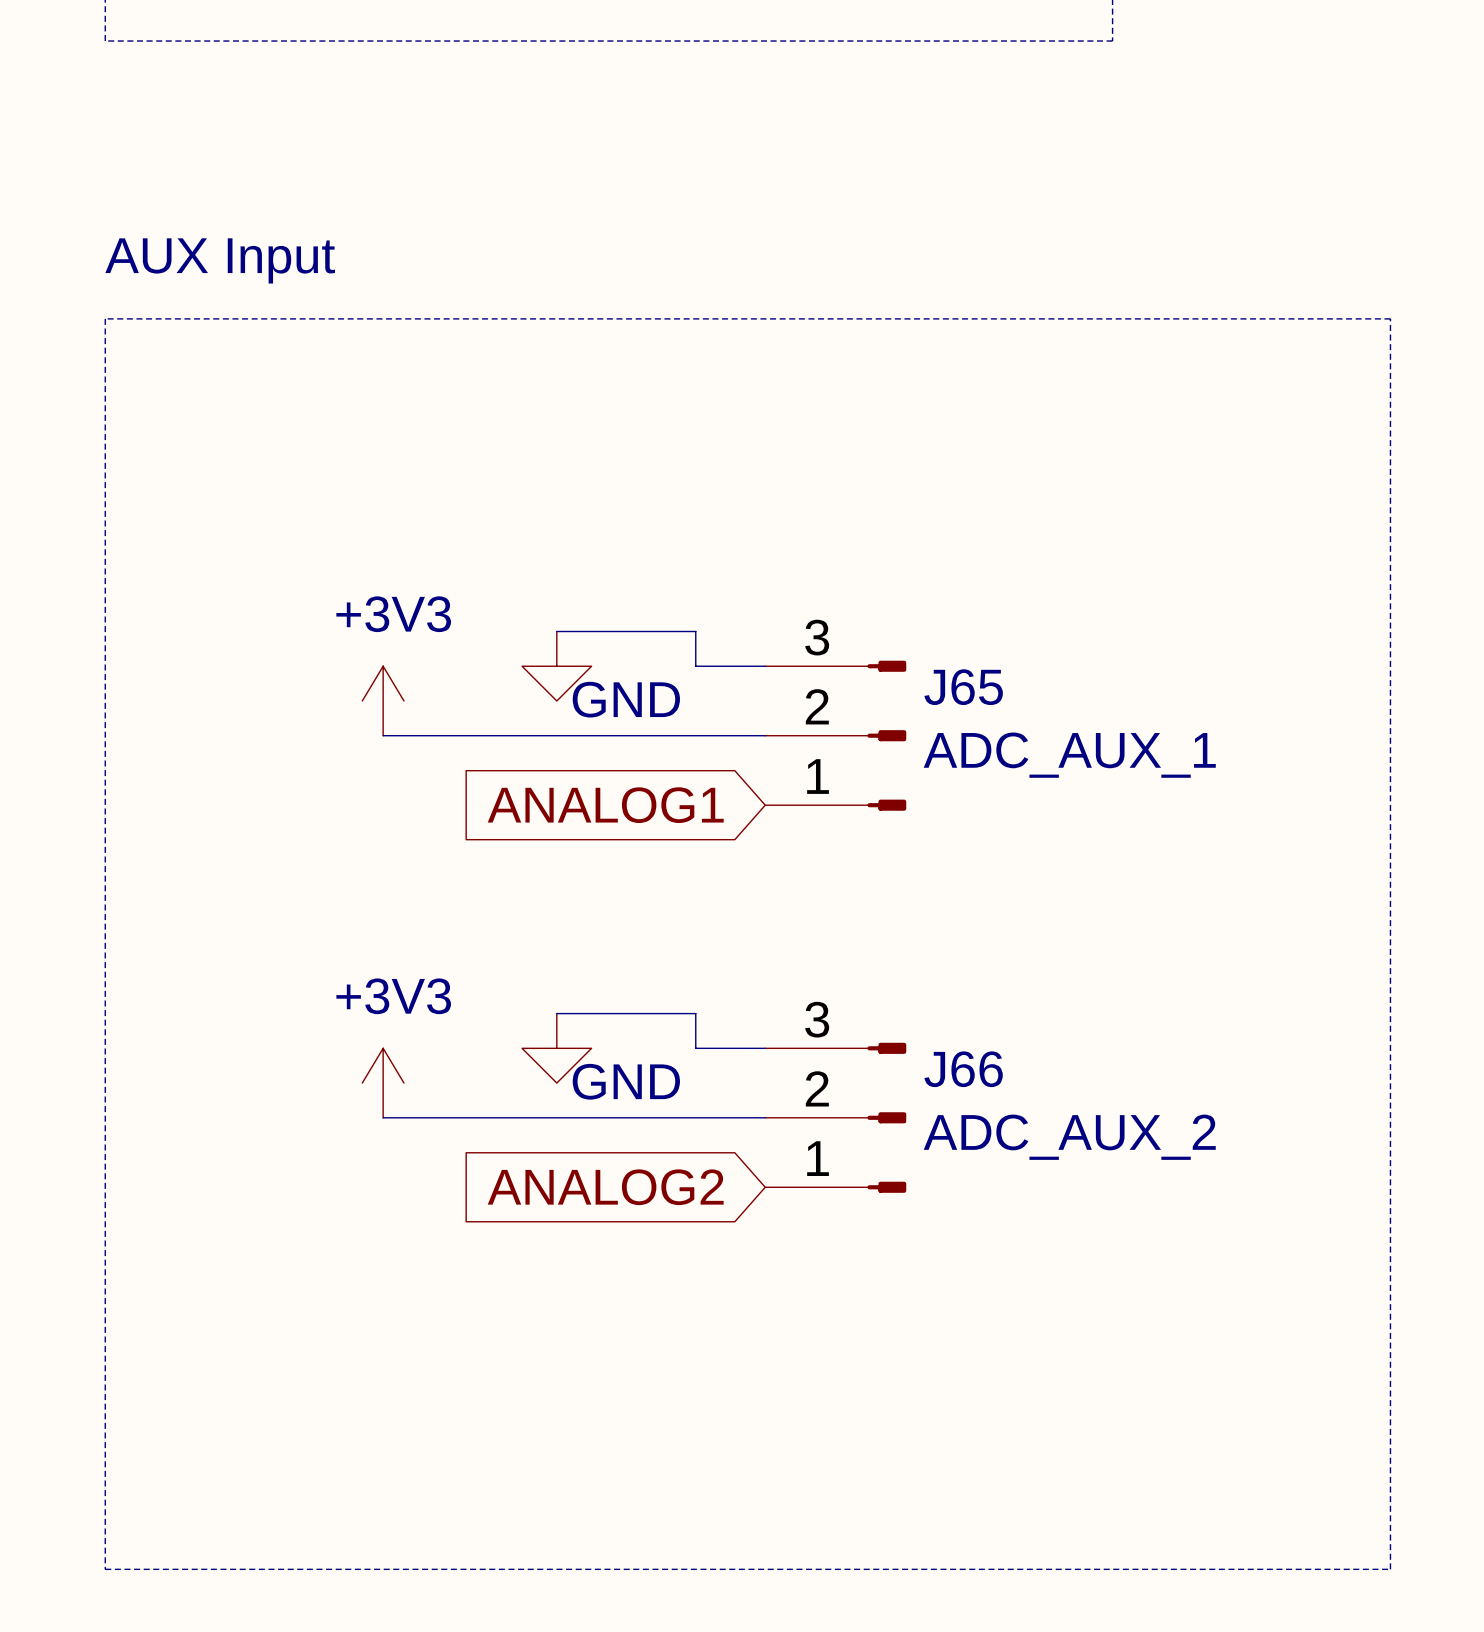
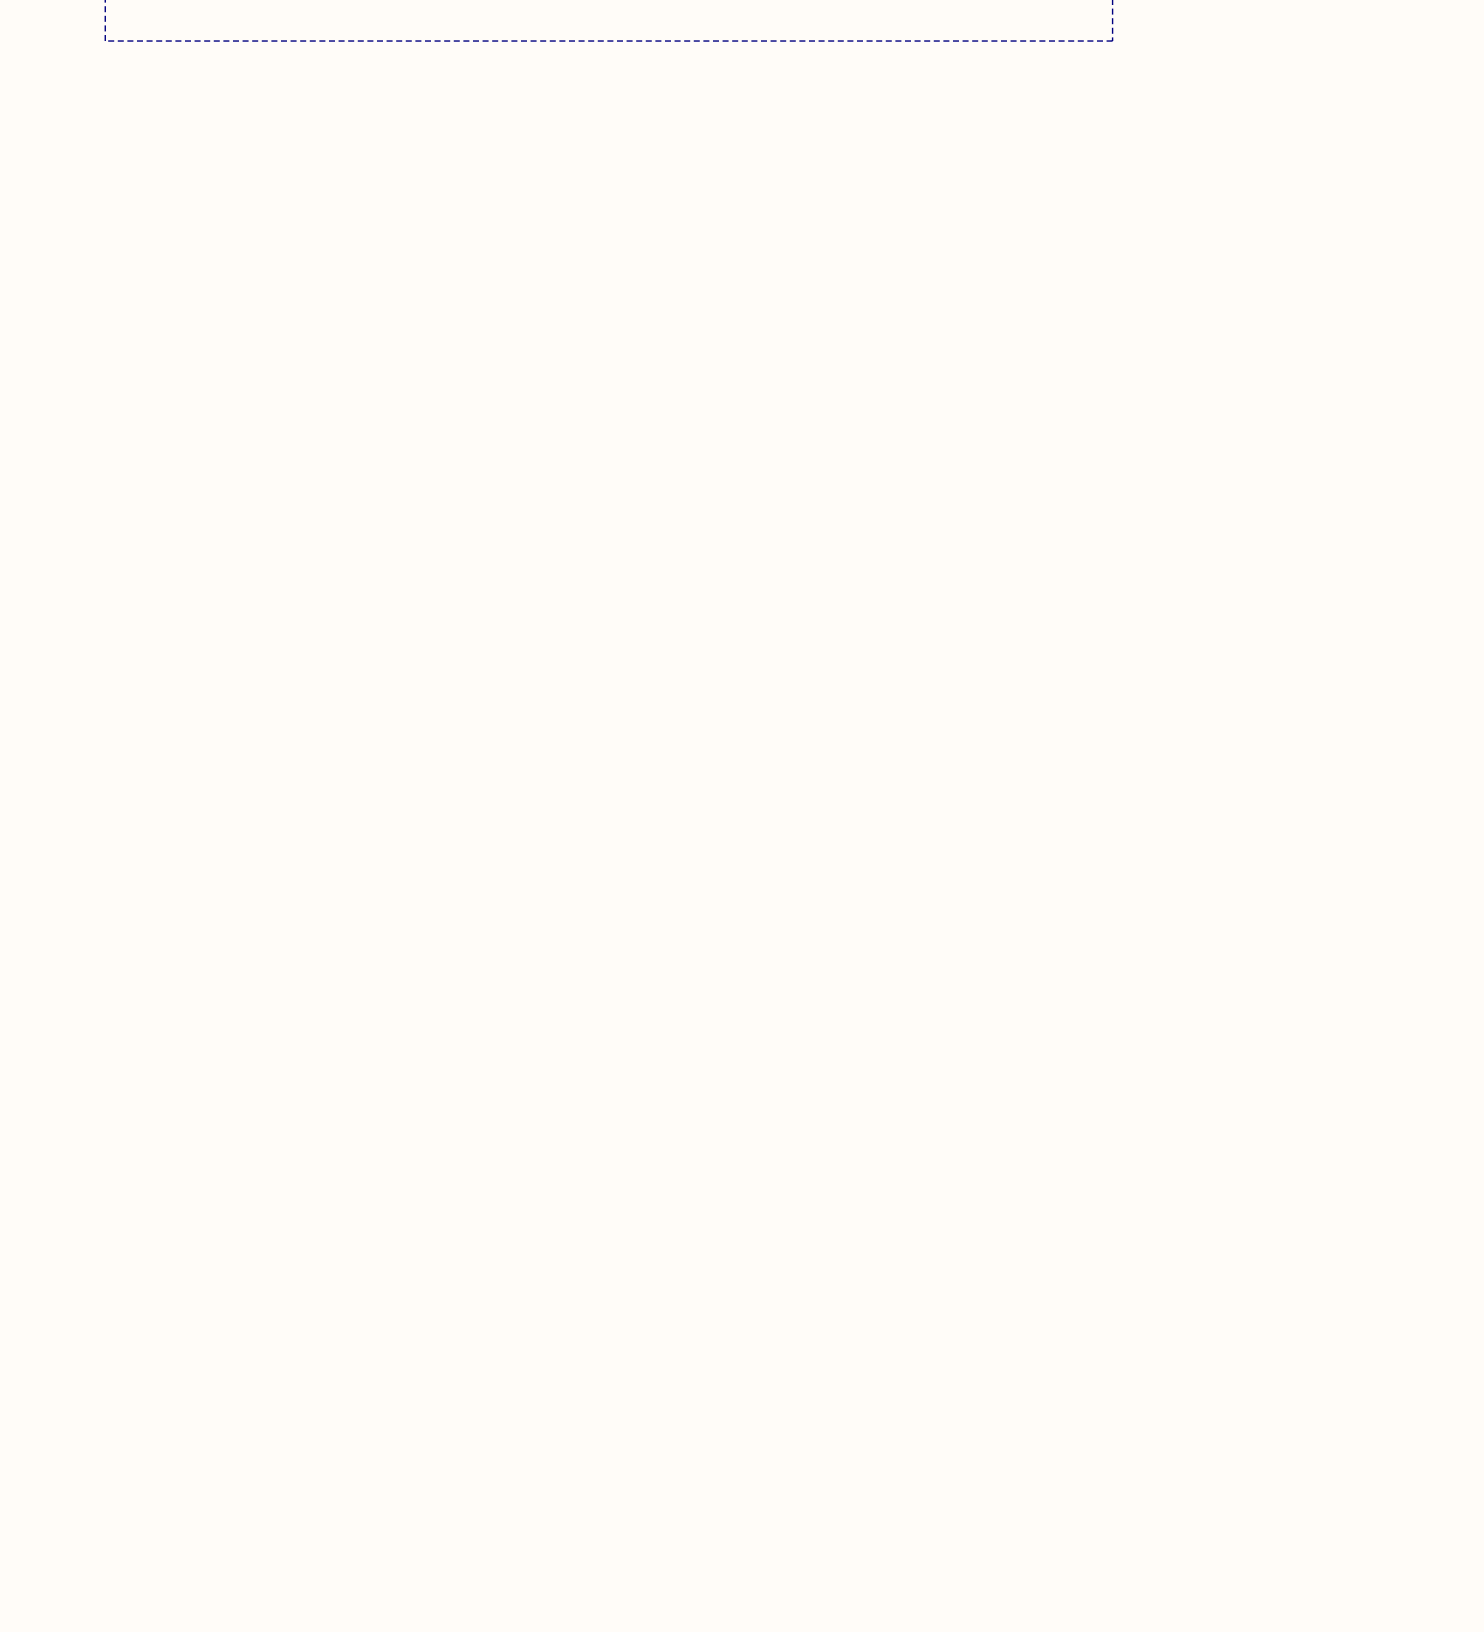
text: AUX Input (220, 260) -> none
line: (105, 318) (105, 1569) (1390, 1569) (1390, 318) (105, 318) -> none
wire: (556, 631) (695, 631) (695, 666) (765, 666) -> none
power symbol: GND (556, 666) -> none
power symbol: +3V3 (383, 700) -> none
wire: (383, 735) (765, 735) -> none
J65: ADC_AUX_1 (835, 735) -> none
global label: ANALOG1 (605, 805) -> none
wire: (556, 1013) (695, 1013) (695, 1048) (765, 1048) -> none
power symbol: GND (556, 1048) -> none
power symbol: +3V3 (383, 1083) -> none
wire: (383, 1117) (765, 1117) -> none
J66: ADC_AUX_2 (835, 1117) -> none
global label: ANALOG2 (605, 1187) -> none

